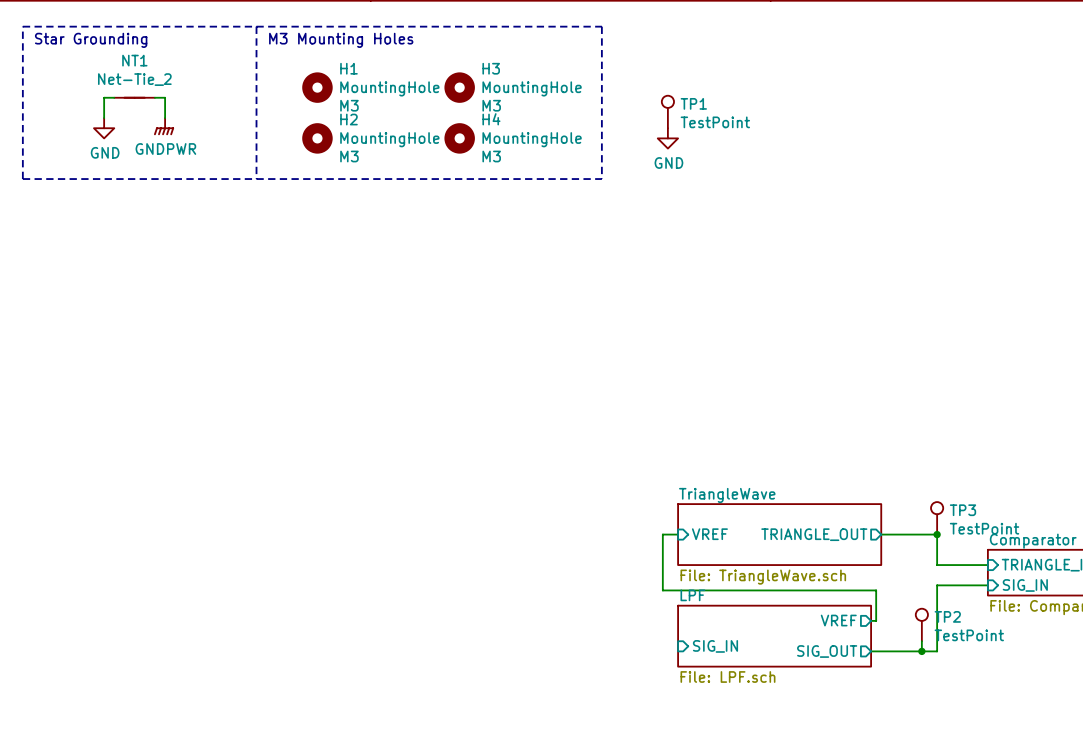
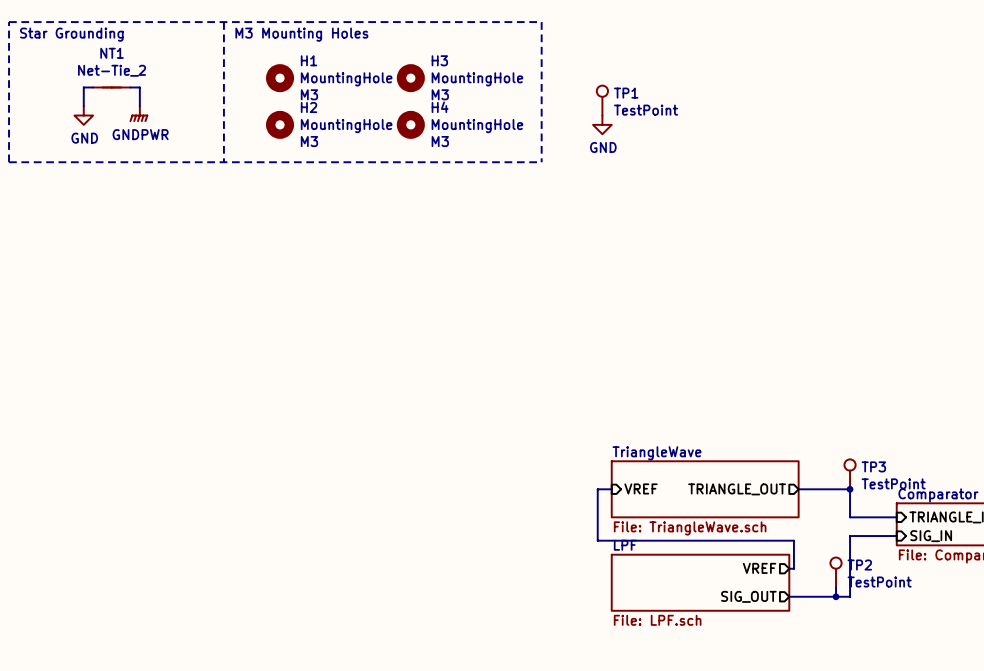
sheet pin: SIG_IN (715, 646) -> none

